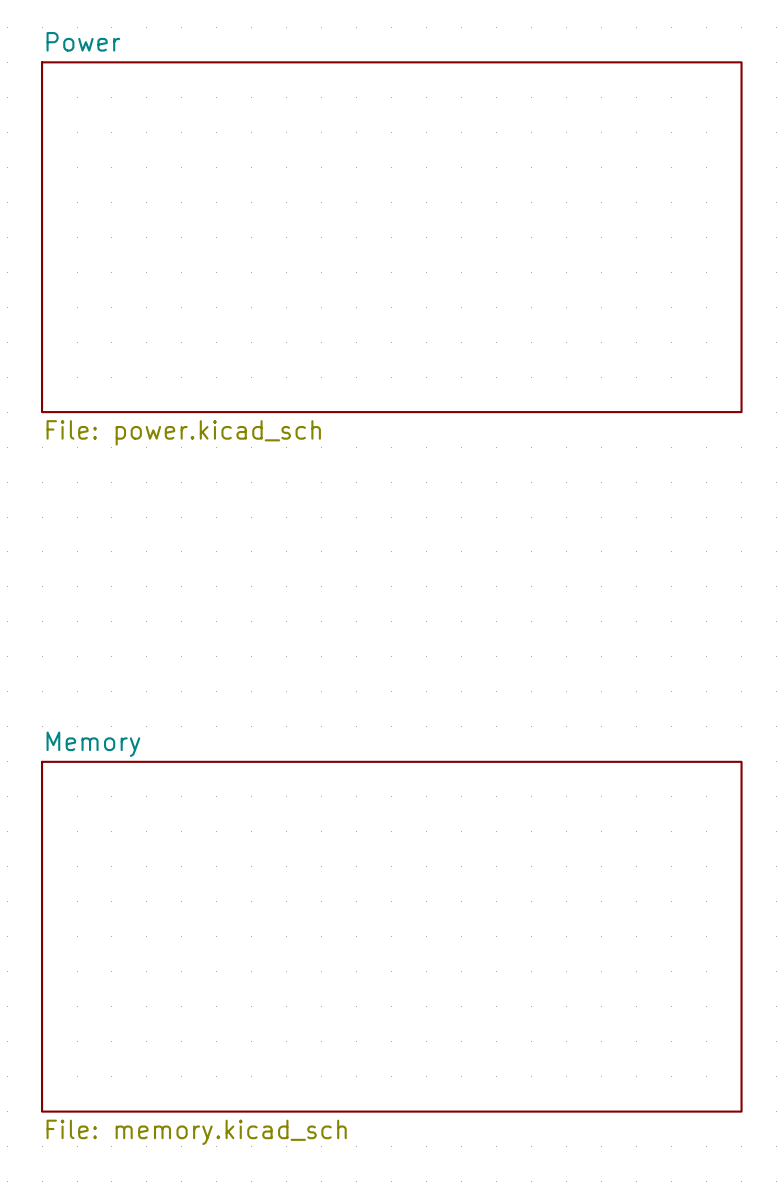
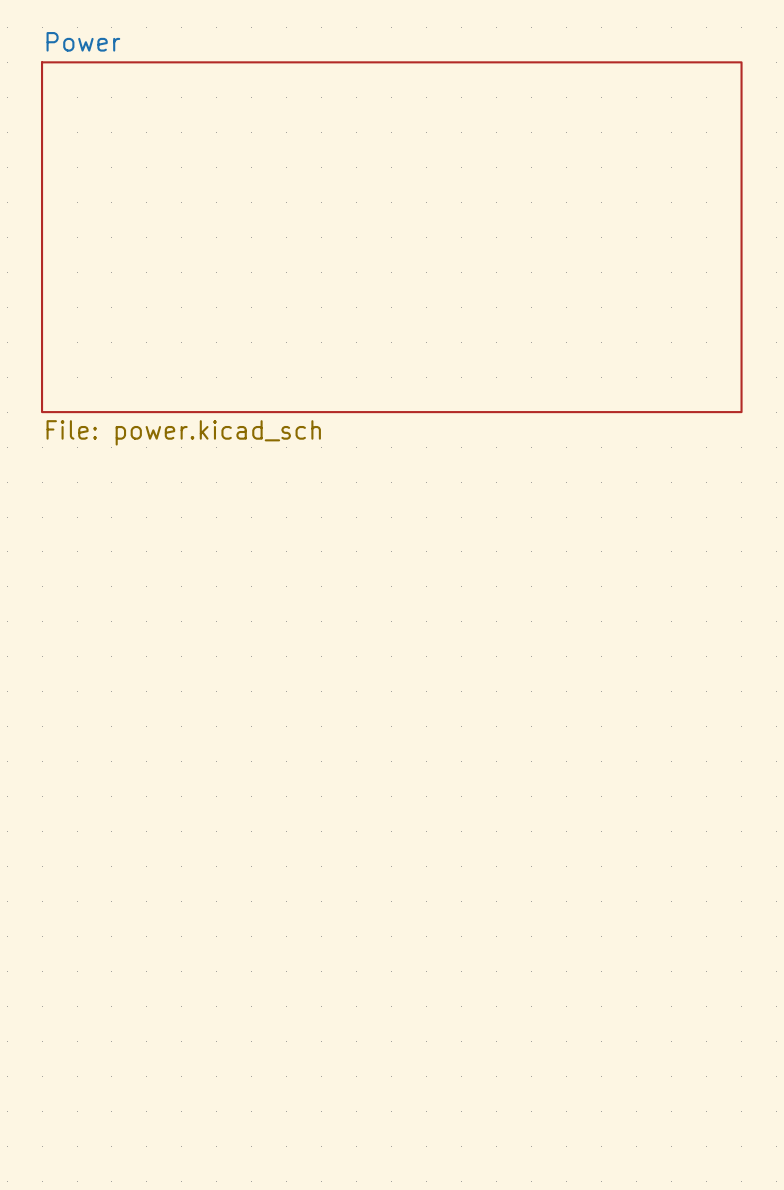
sheet Memory: File: memory.kicad_sch (391, 936) -> none

